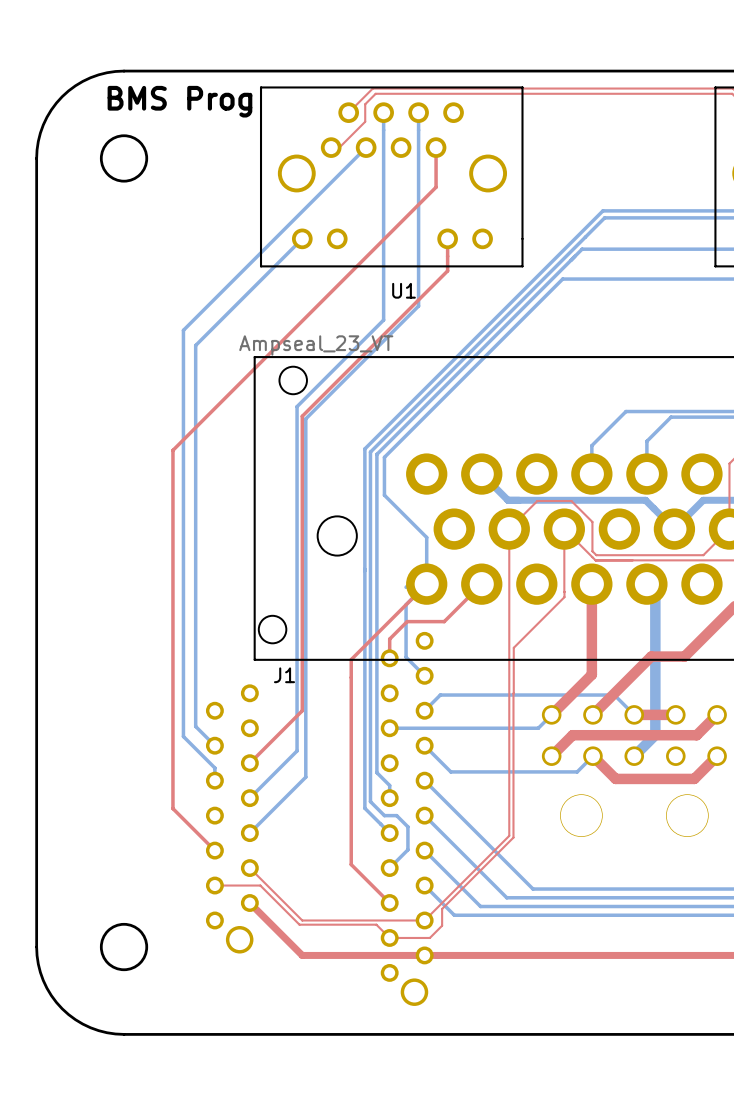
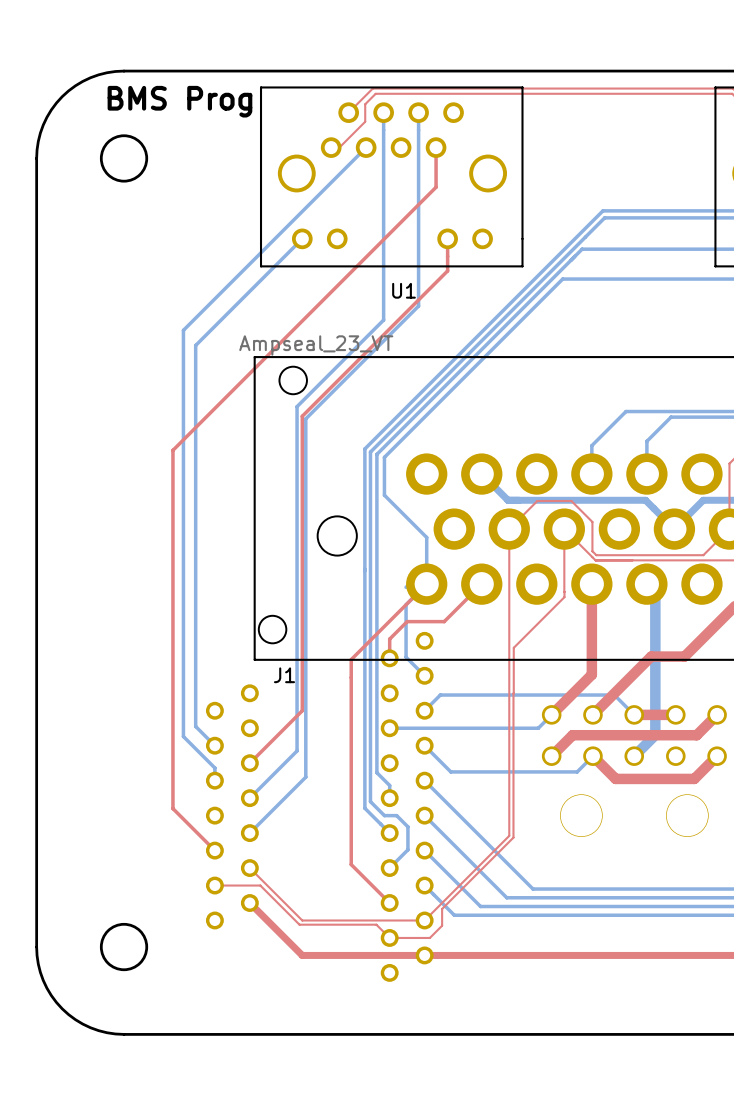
part footprint: [380, 631, 434, 1006] -> [380, 631, 434, 982]
part footprint: [205, 684, 259, 954] -> [205, 684, 259, 930]

